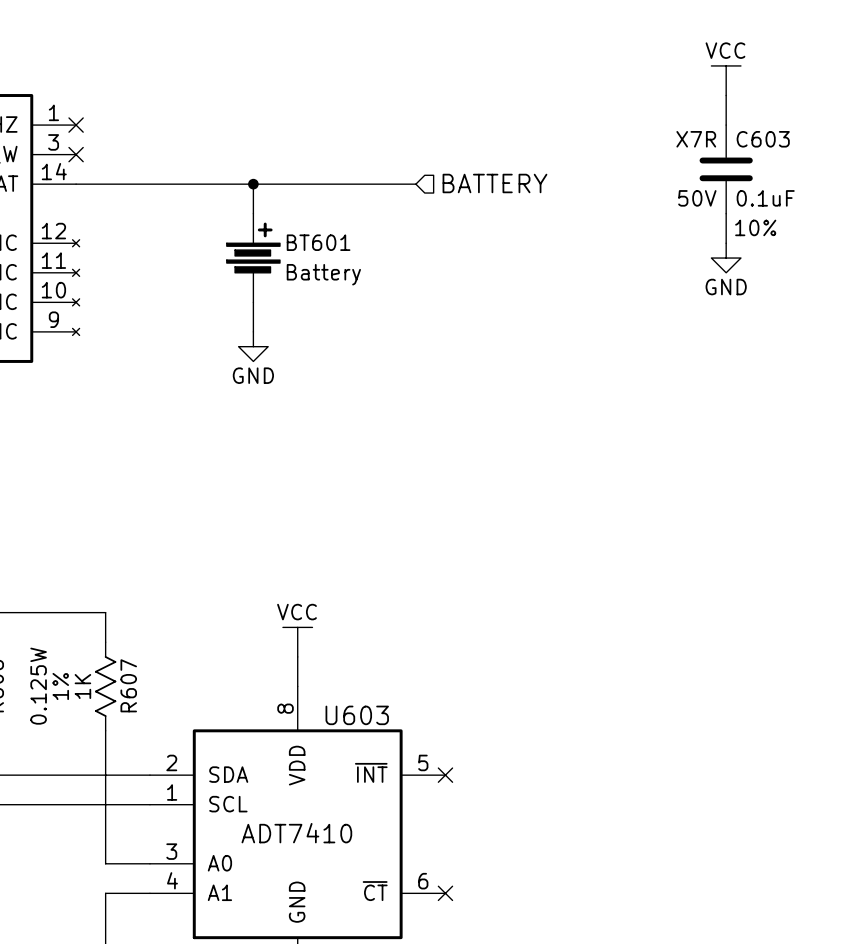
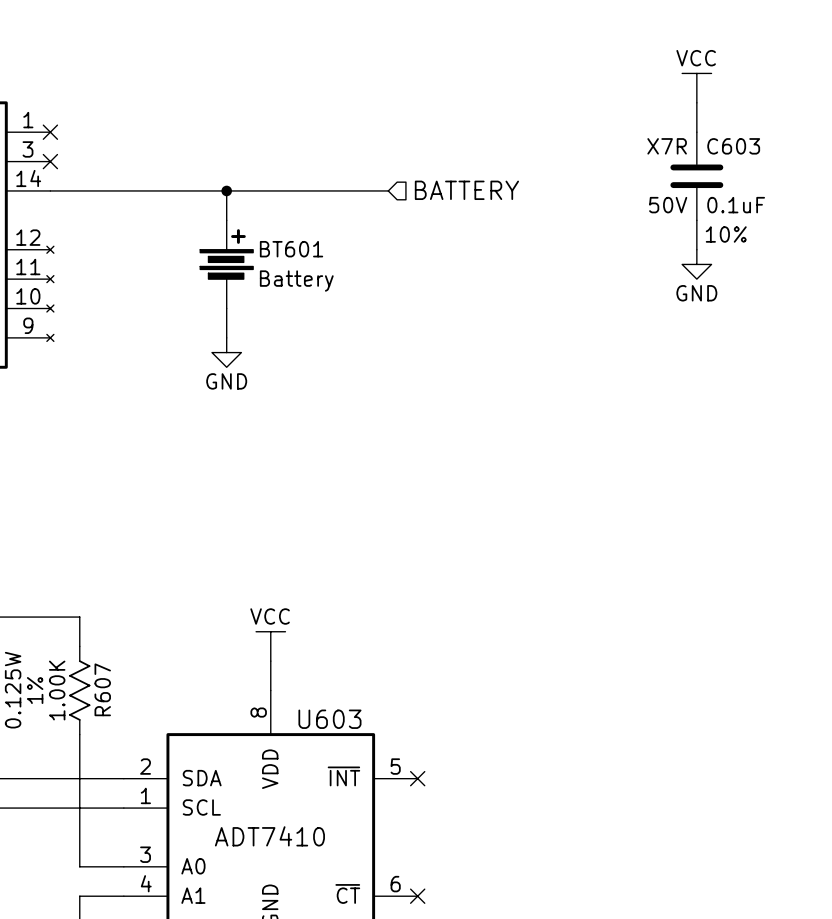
R607 value: 1K (82, 686) -> 1.00K (57, 690)

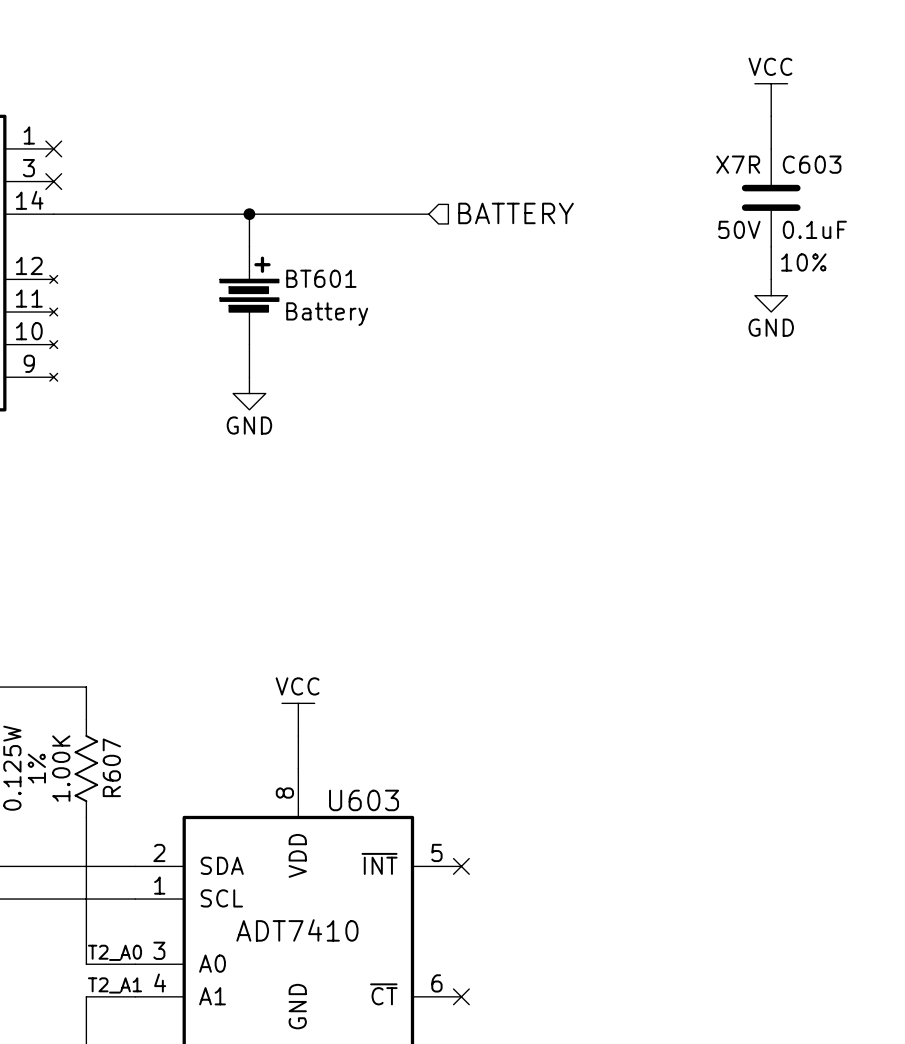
label: none -> T2_A0 (114, 952)
label: none -> T2_A1 (114, 985)

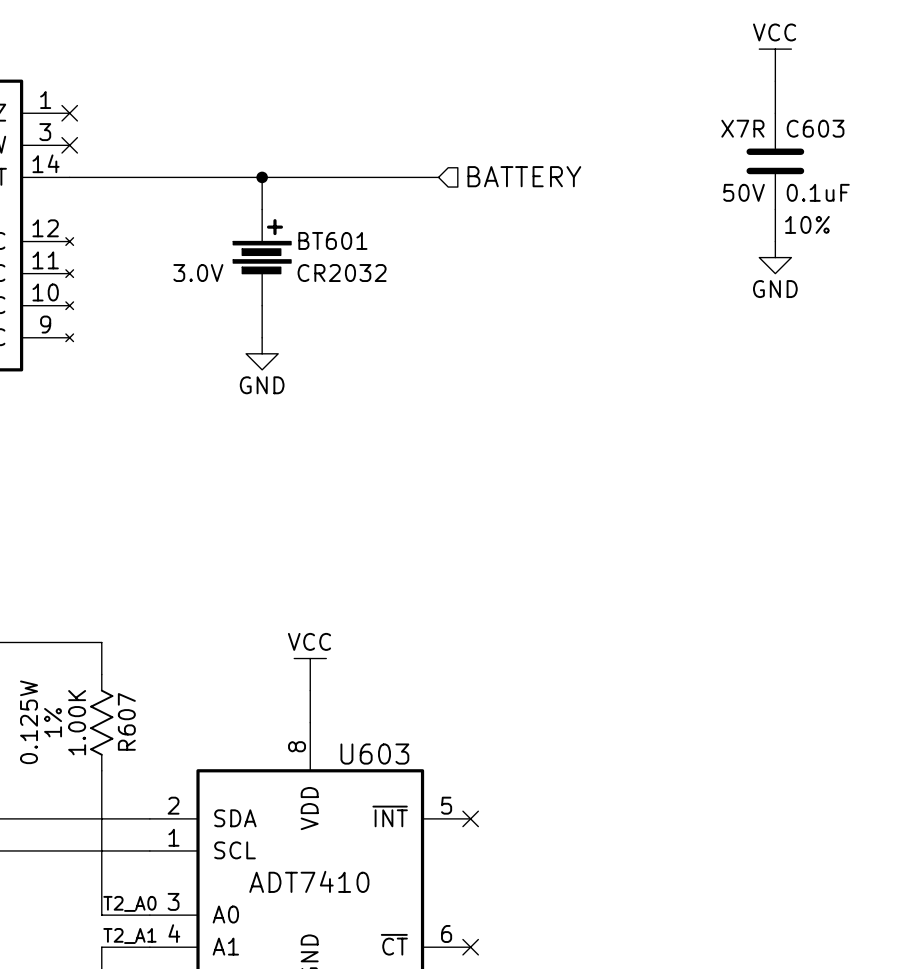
BT601 text: none -> 3.0V (198, 273)
BT601 value: Battery (327, 314) -> CR2032 (342, 273)

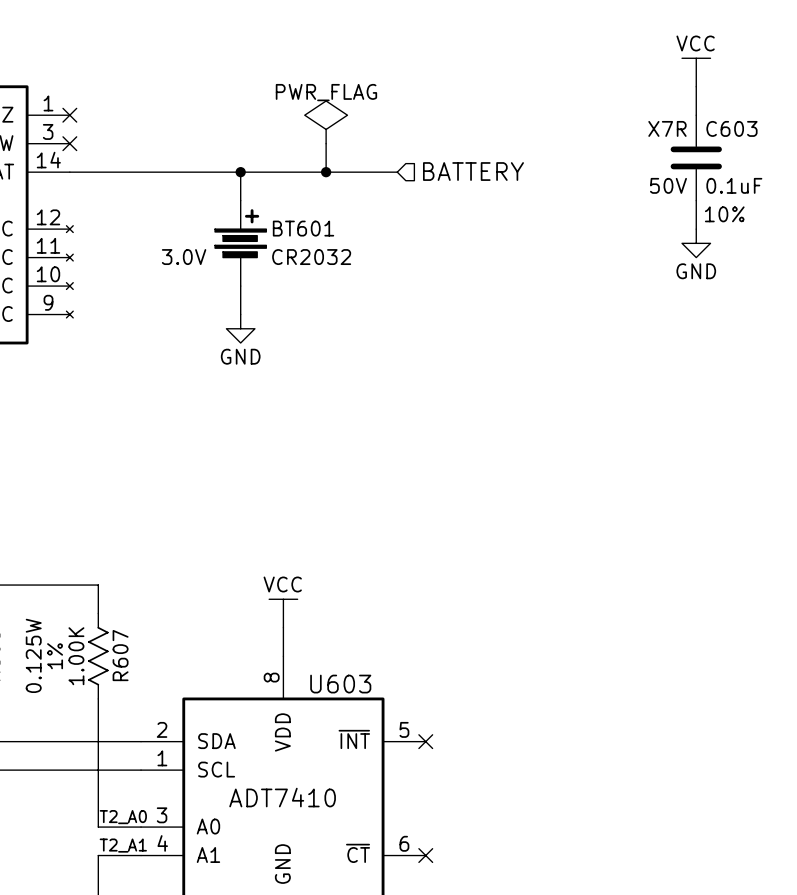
power symbol: none -> PWR_FLAG (326, 122)
wire: none -> (326, 143) (326, 172)
junction: none -> (326, 172)

